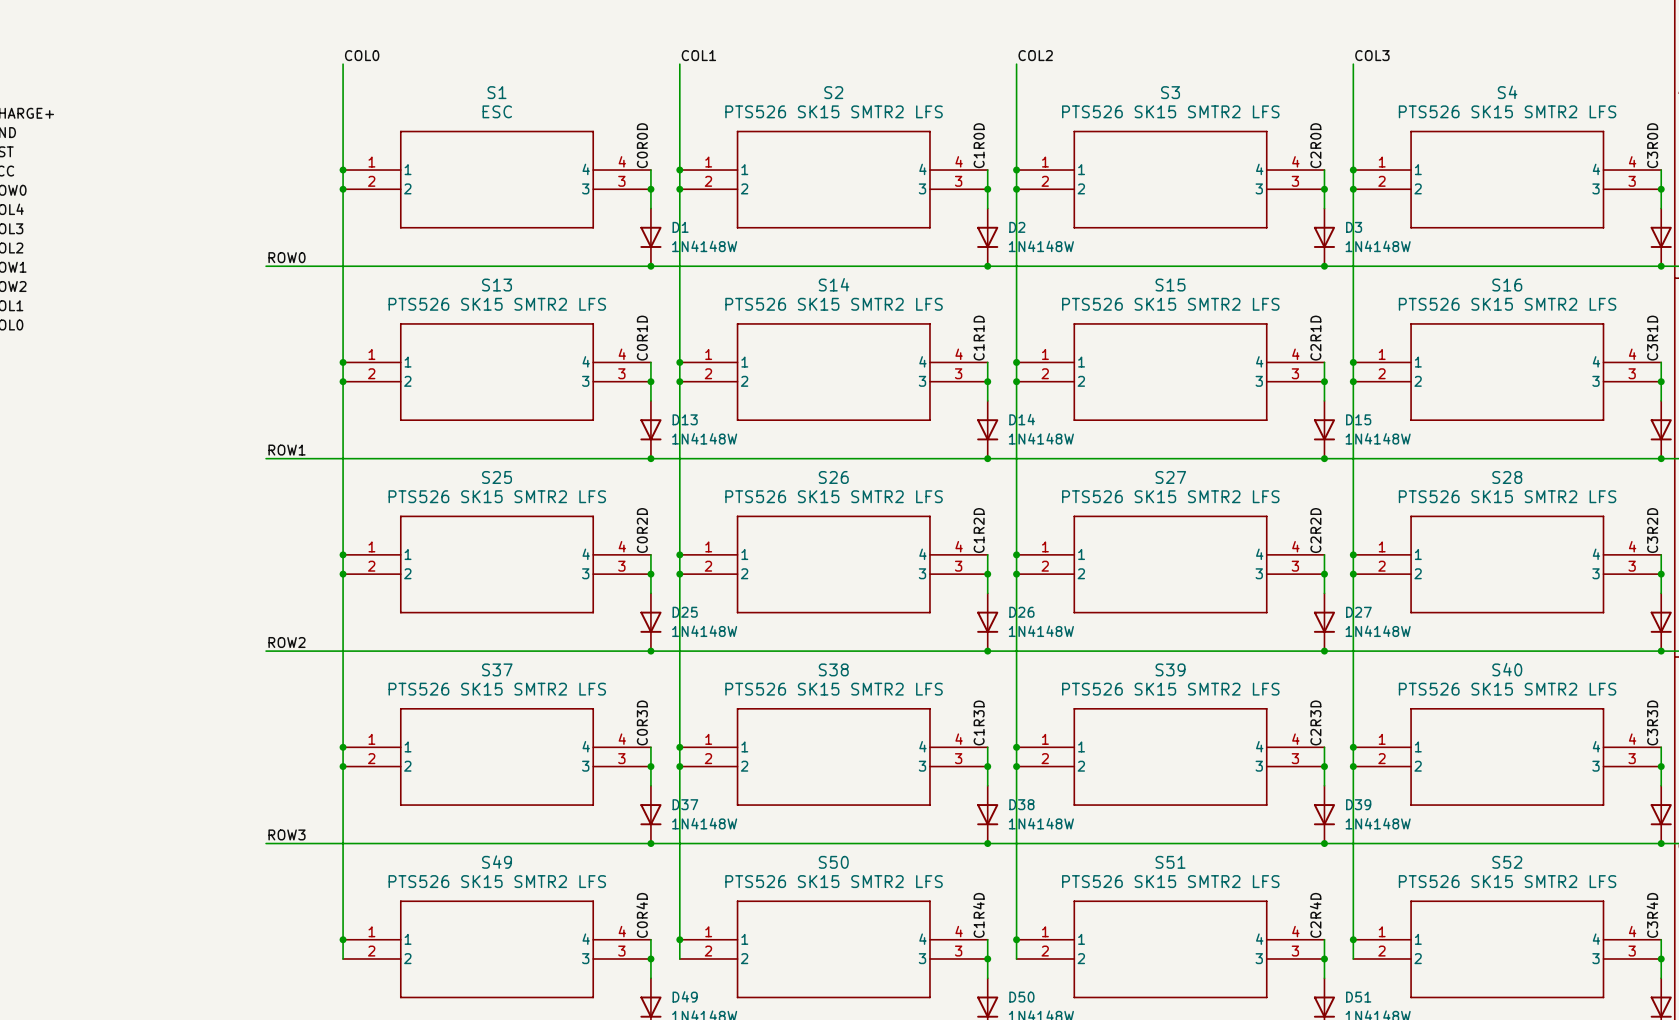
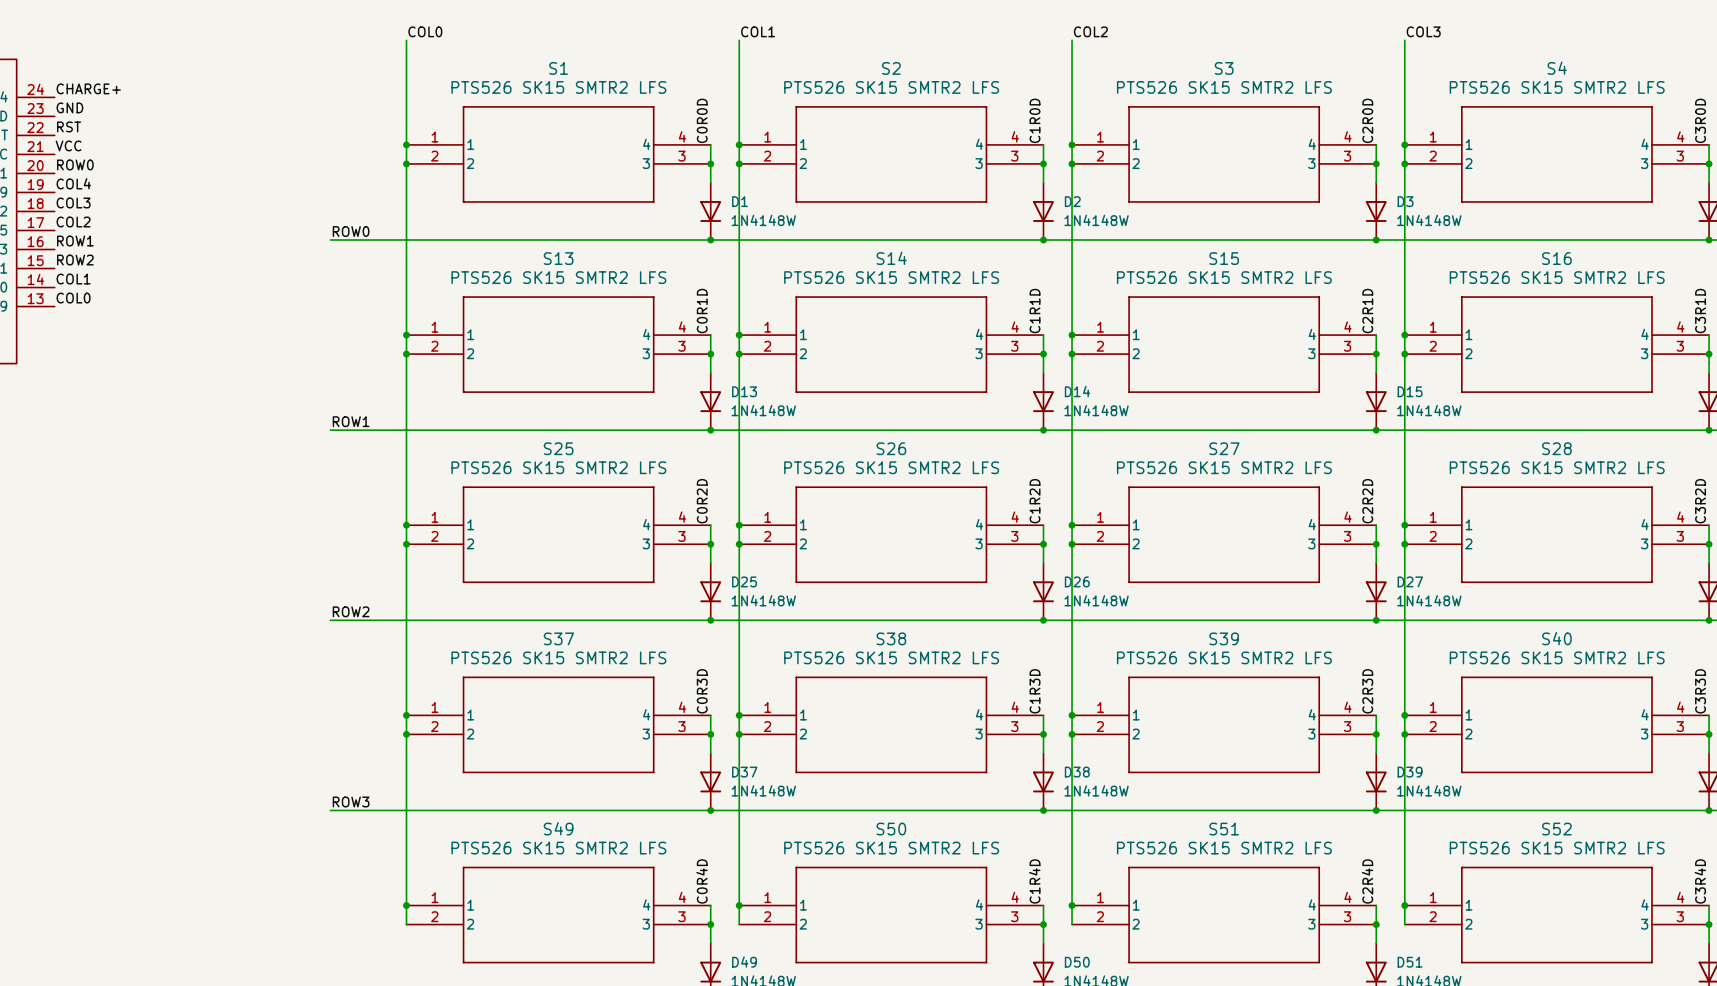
S1 value: ESC (497, 111) -> PTS526 SK15 SMTR2 LFS (558, 87)

